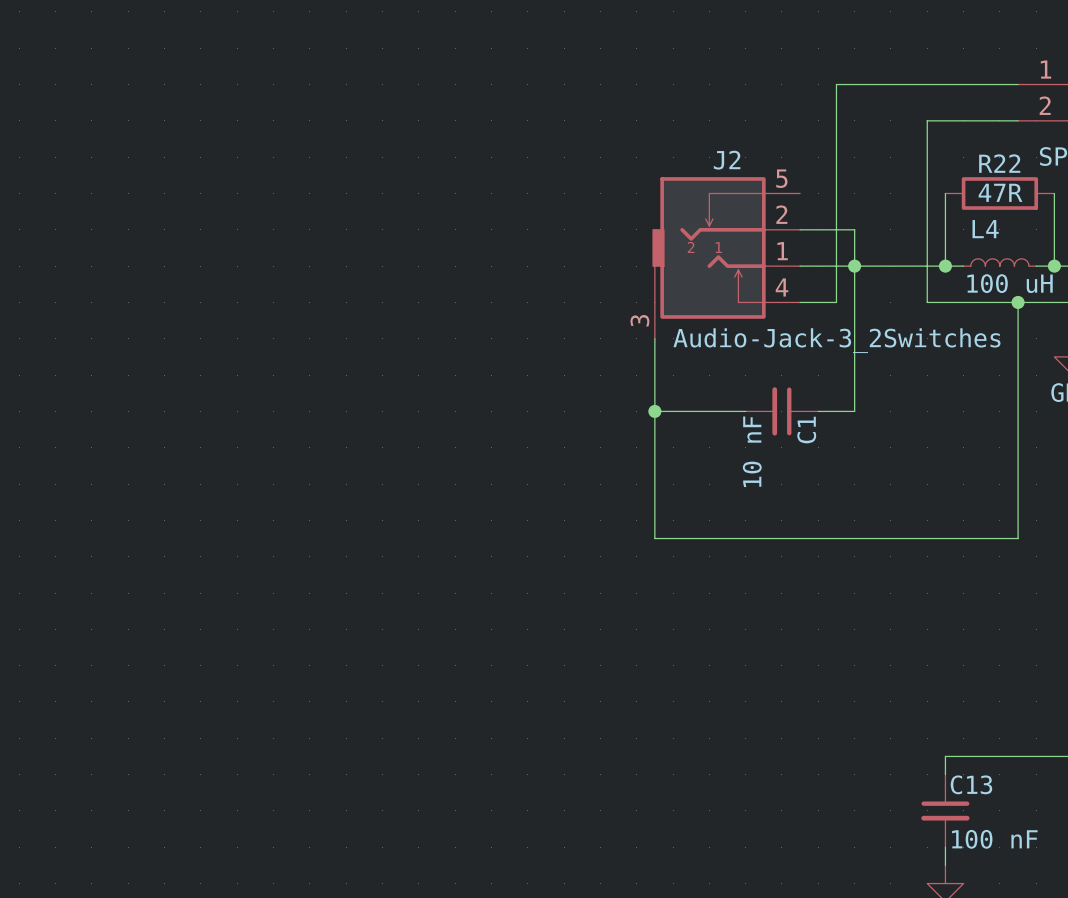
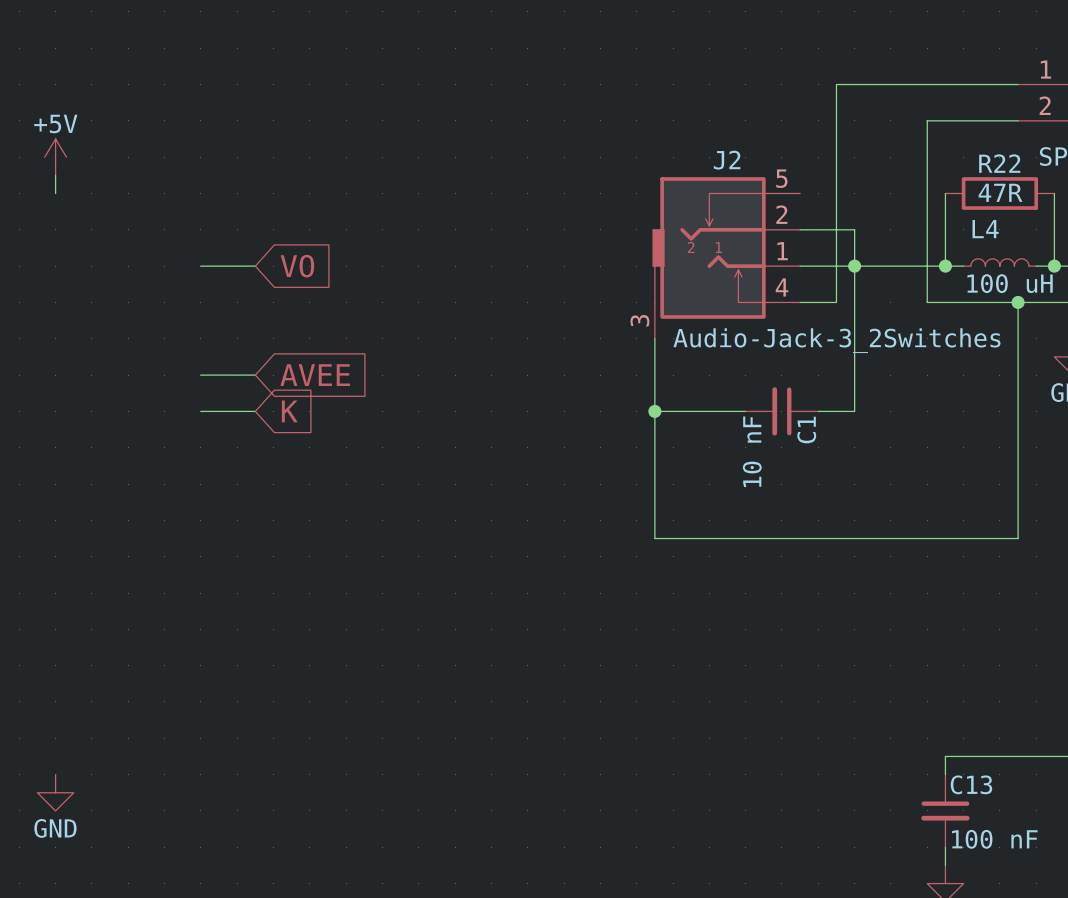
power symbol: none -> +5V (55, 157)
wire: none -> (55, 175) (55, 193)
wire: none -> (200, 266) (255, 266)
global label: none -> VO (297, 266)
wire: none -> (200, 375) (255, 375)
global label: none -> AVEE (315, 375)
wire: none -> (200, 411) (255, 411)
global label: none -> K (289, 411)
power symbol: none -> GND (55, 792)

